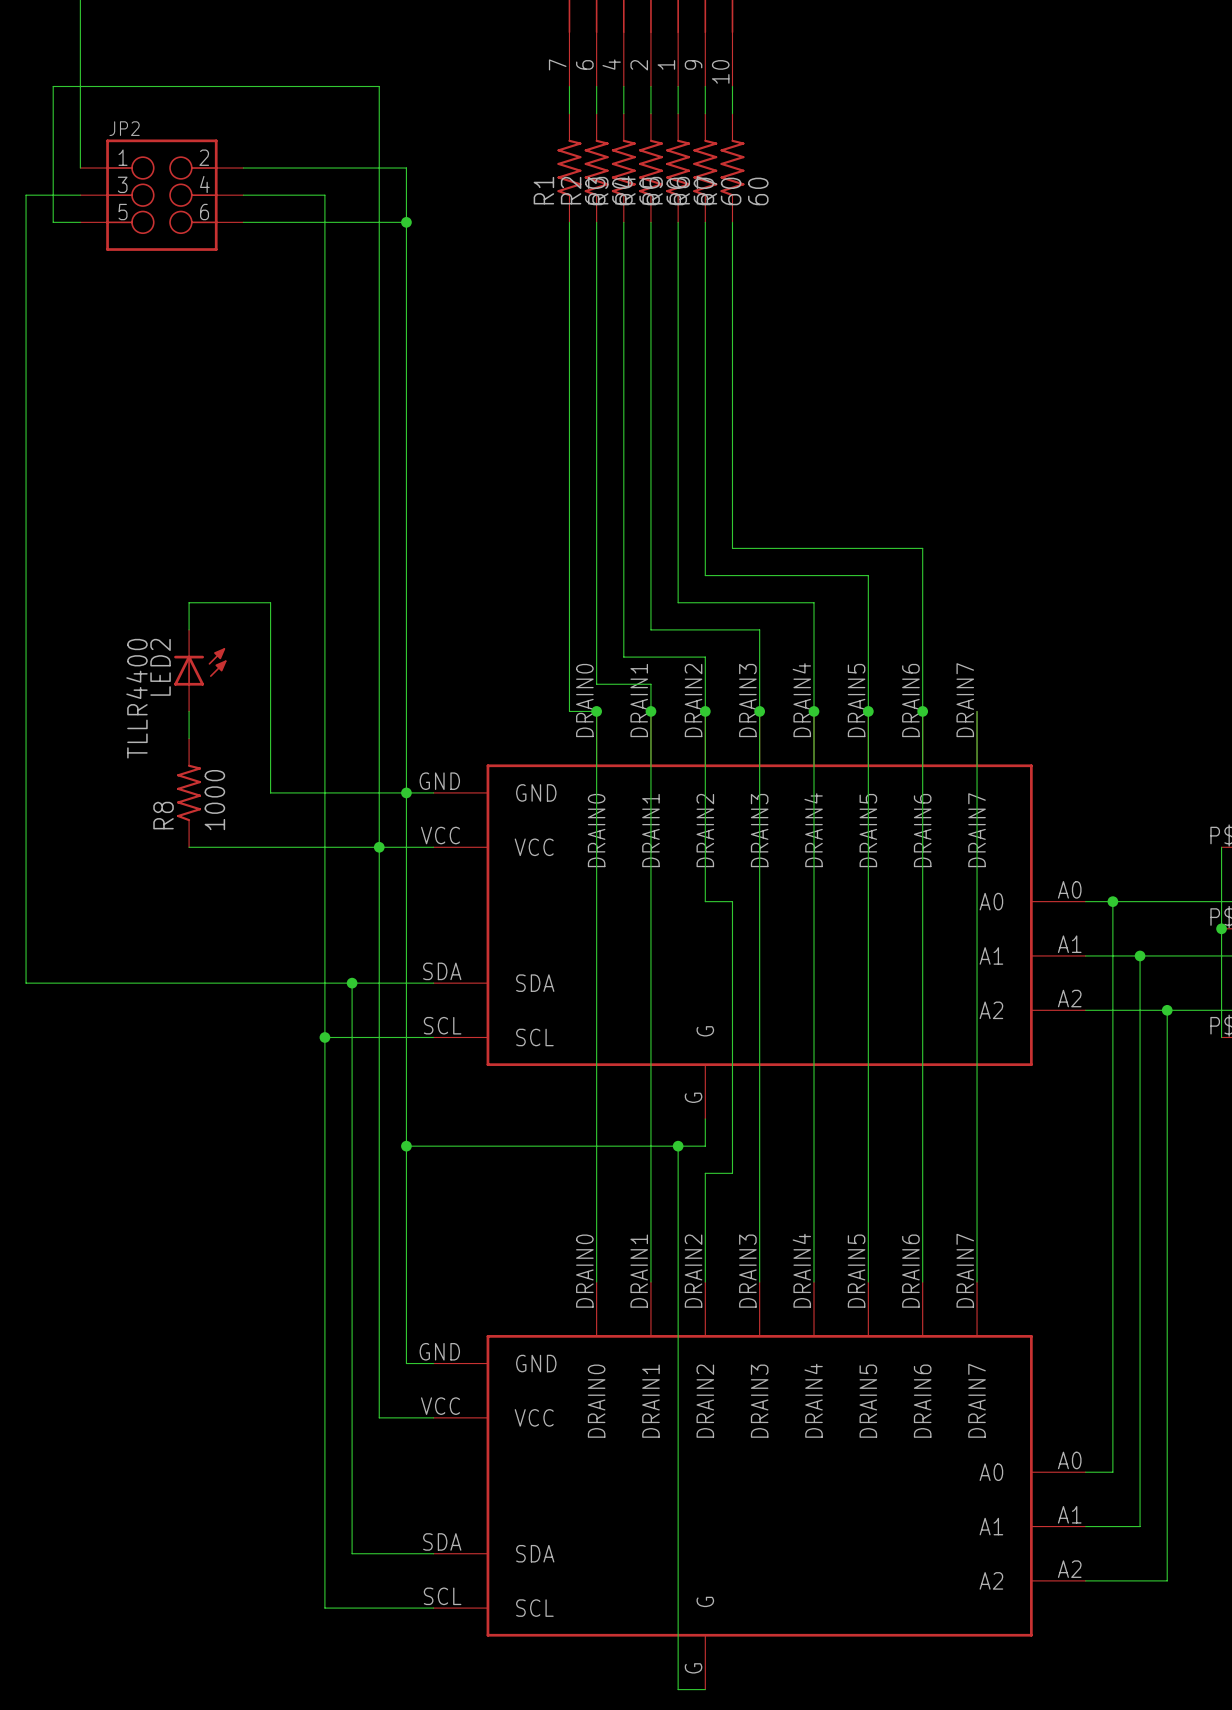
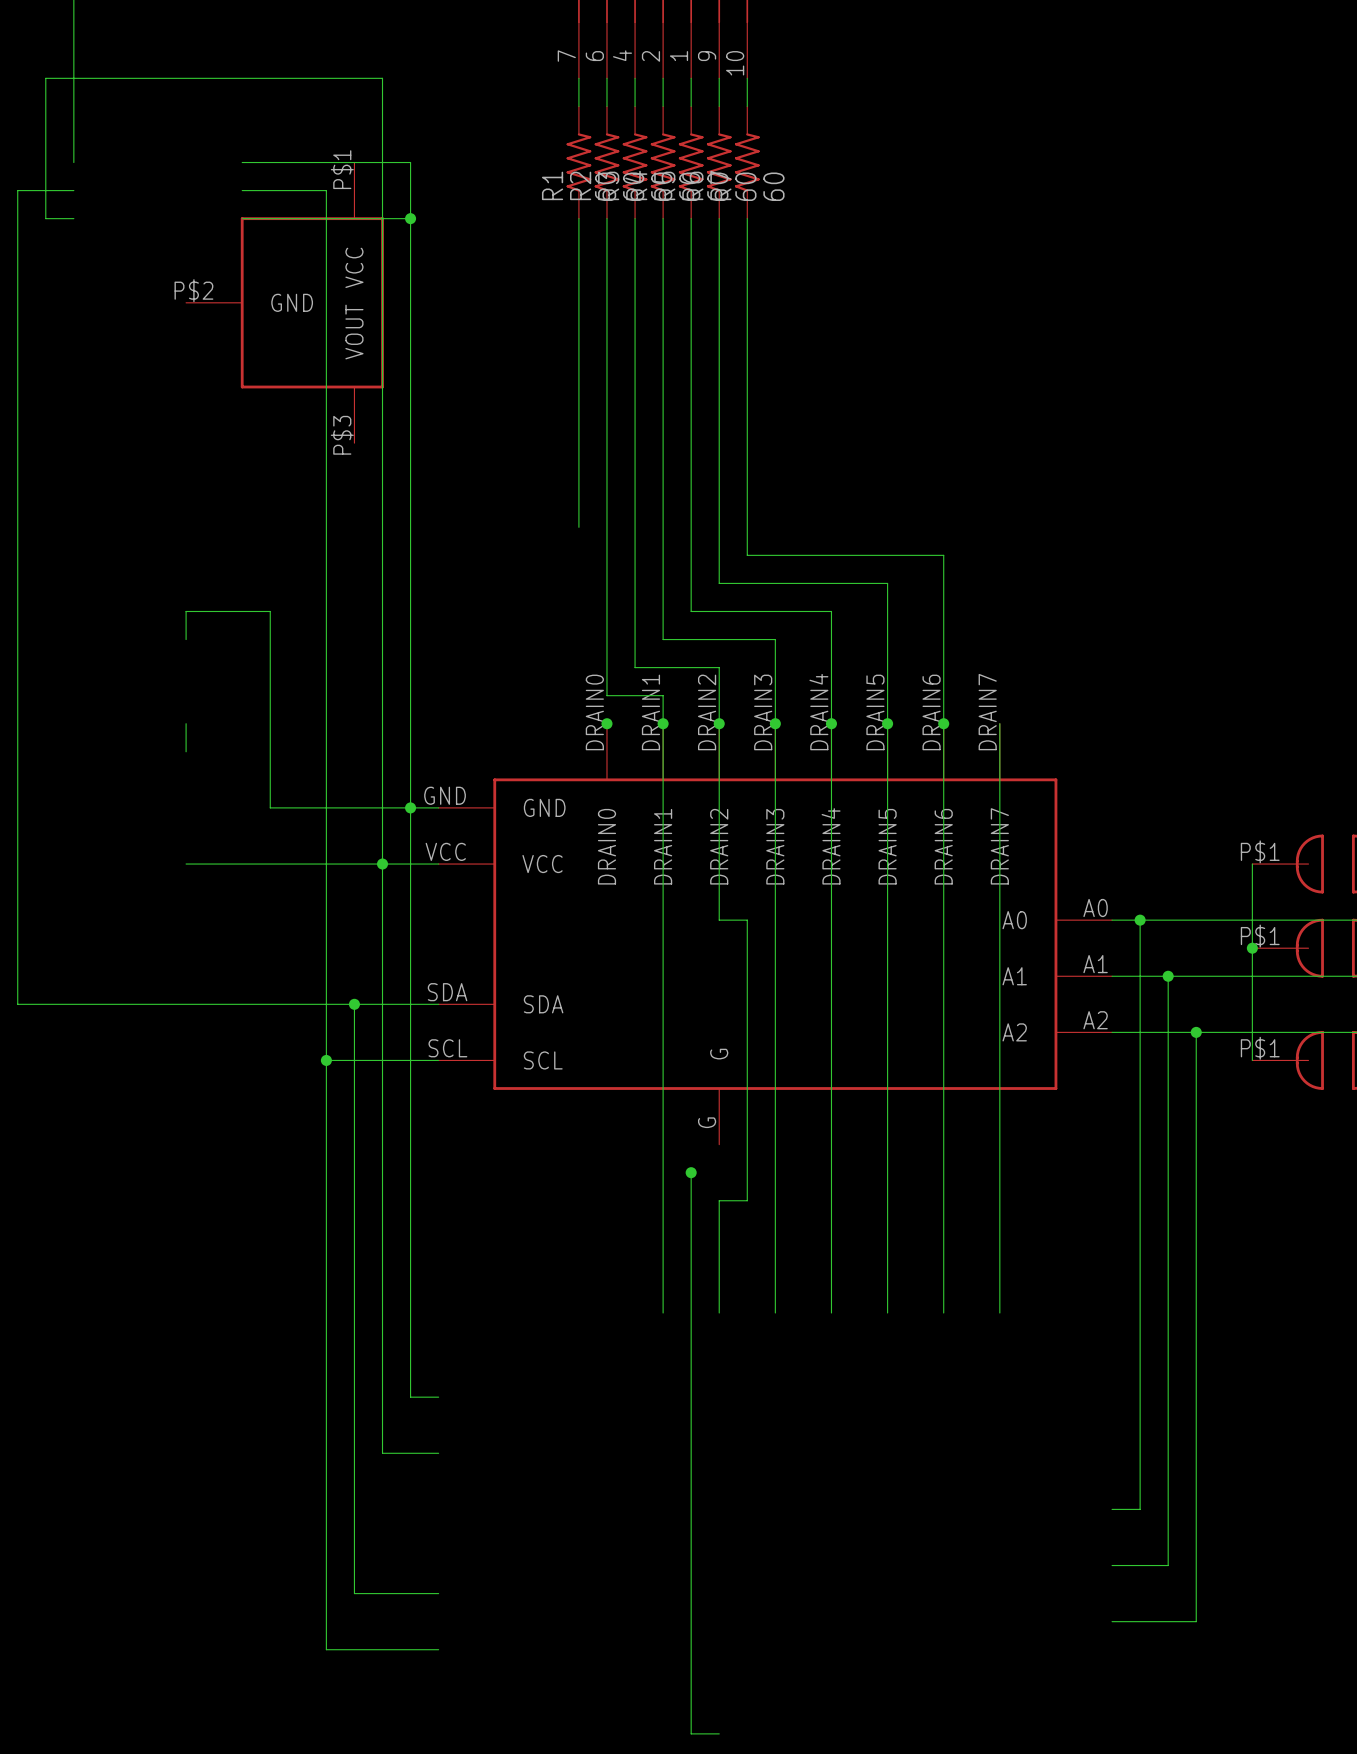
JP2: (161, 195) -> none
part: none -> (285, 302)
wire: (569, 521) (569, 711) (596, 711) (596, 1282) -> none
LED2: TLLR4400 (200, 670) -> none
R8: 1000 (189, 792) -> none
wire: (705, 1118) (705, 1146) (406, 1146) -> none
junction: (406, 1146) -> none
part: (759, 1485) -> none

